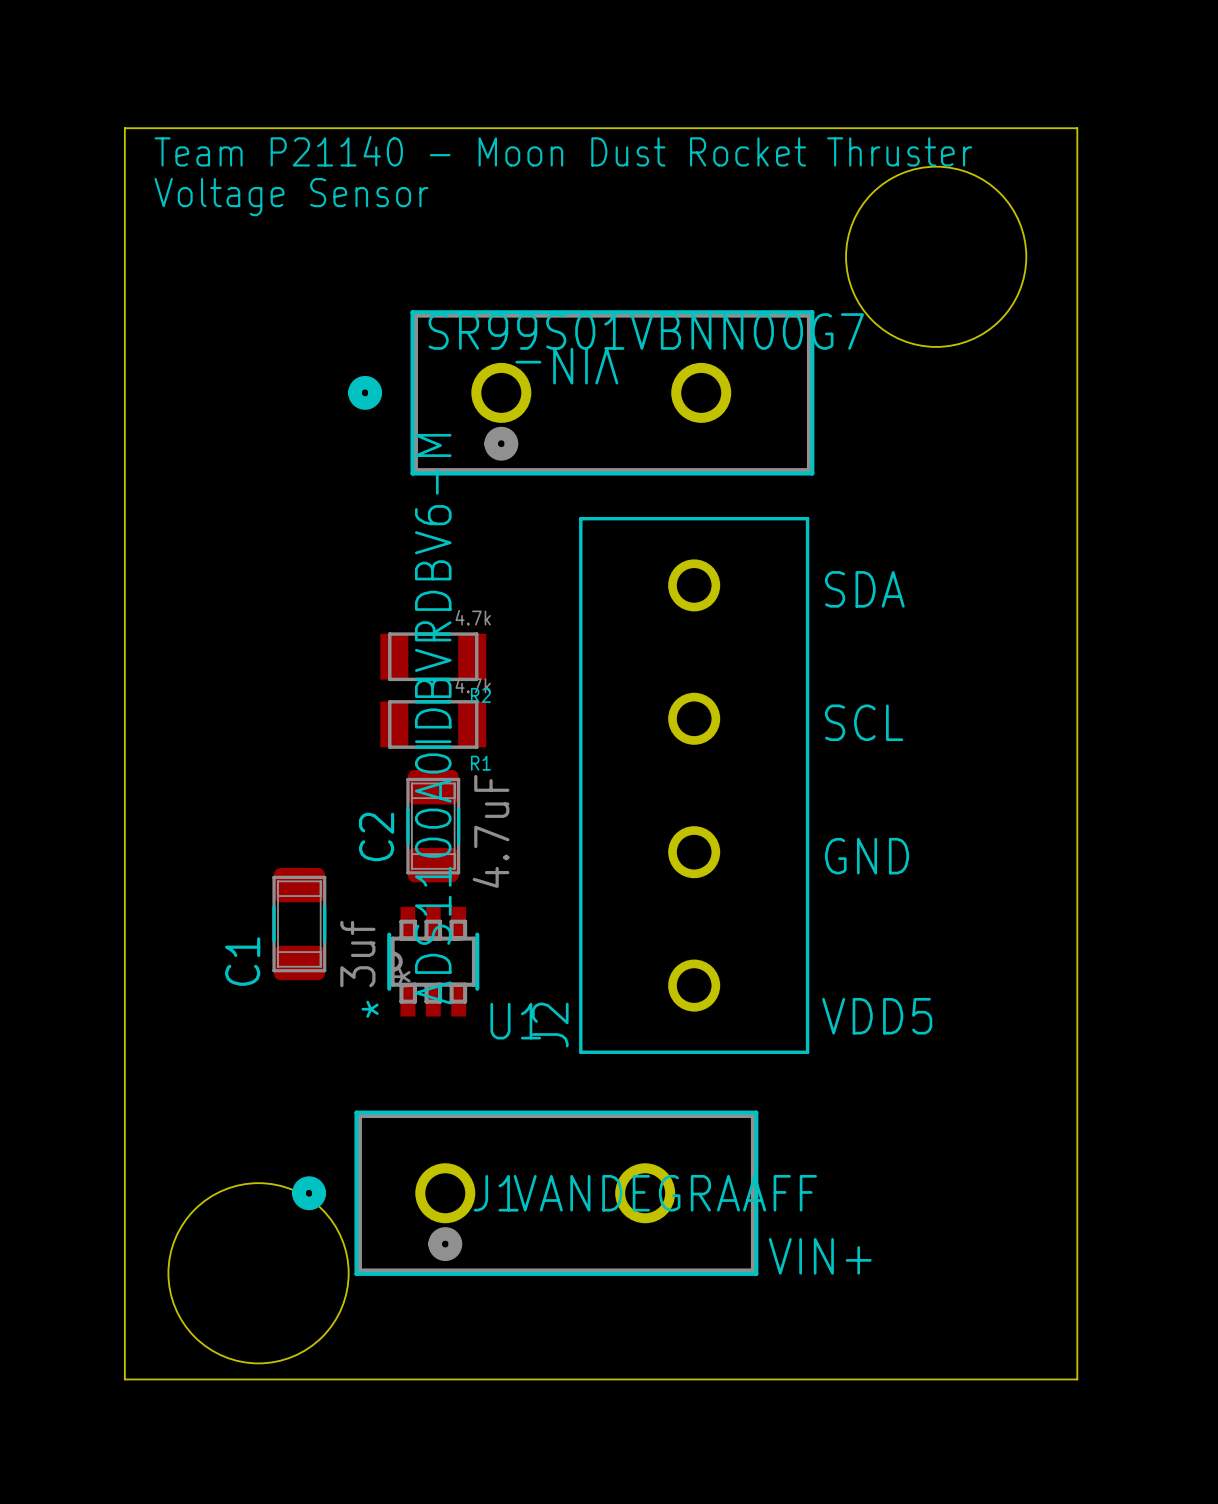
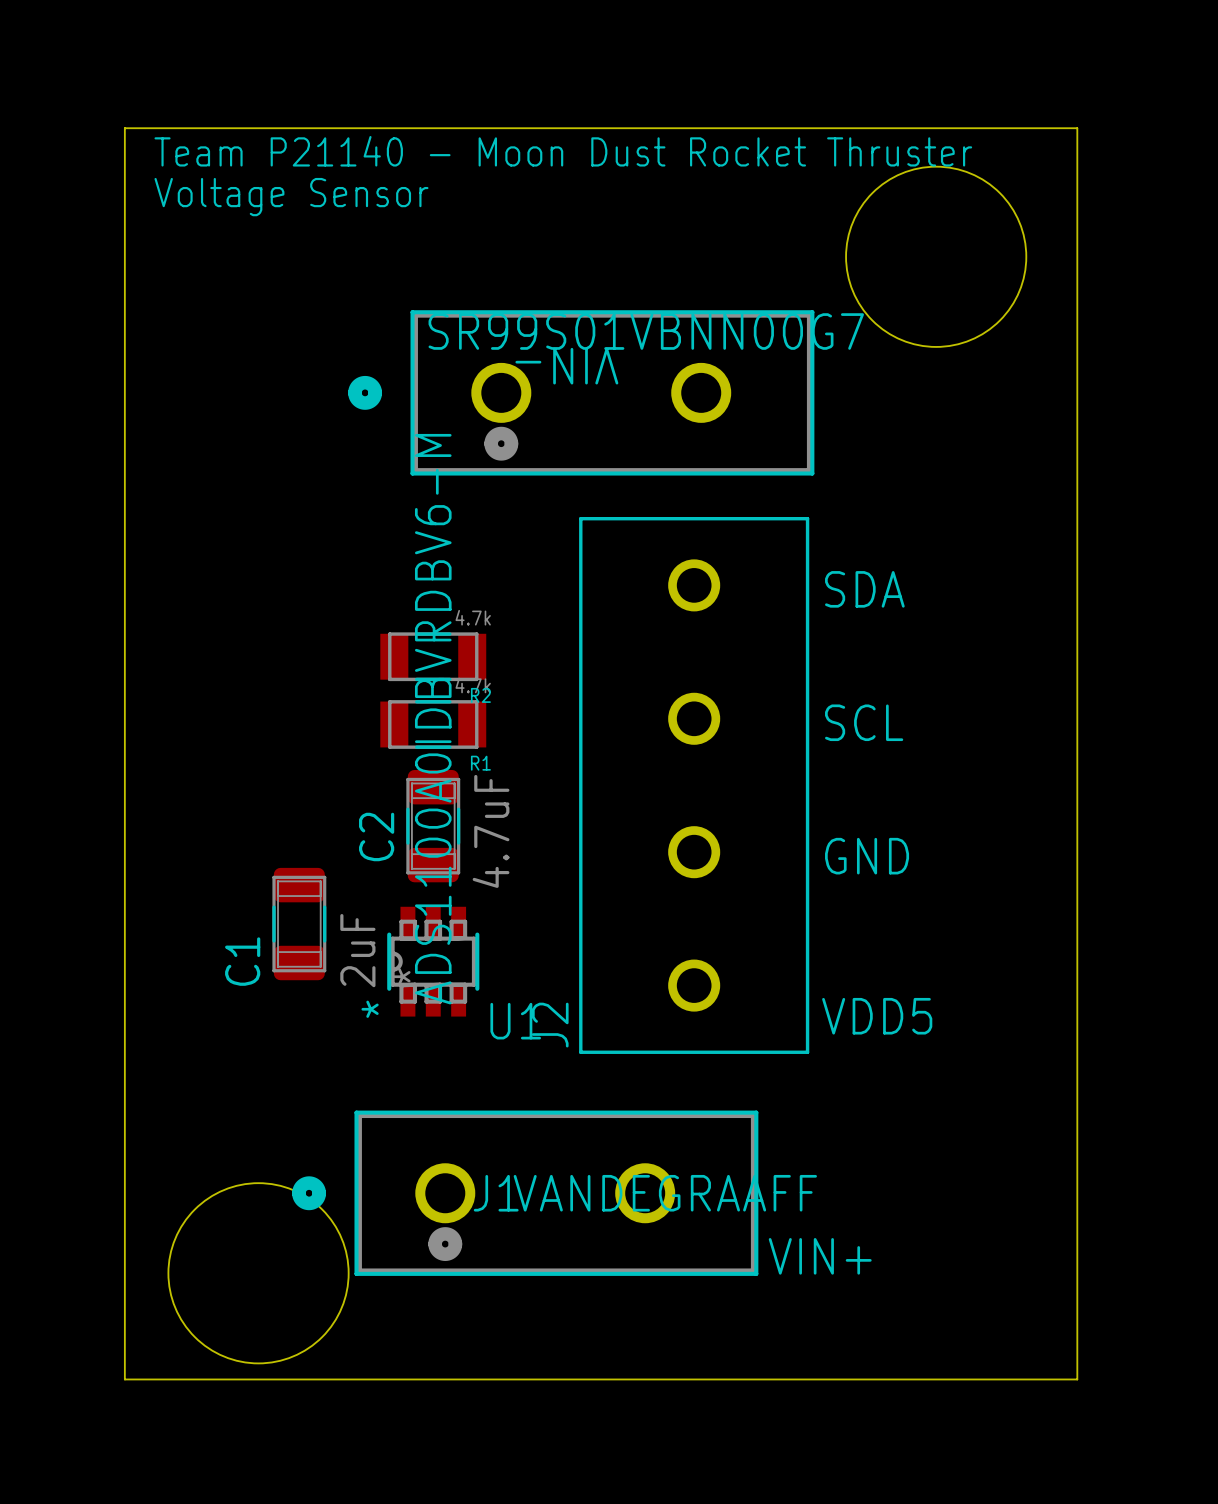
C1 value: 3uf (357, 954) -> 2uF (357, 950)

